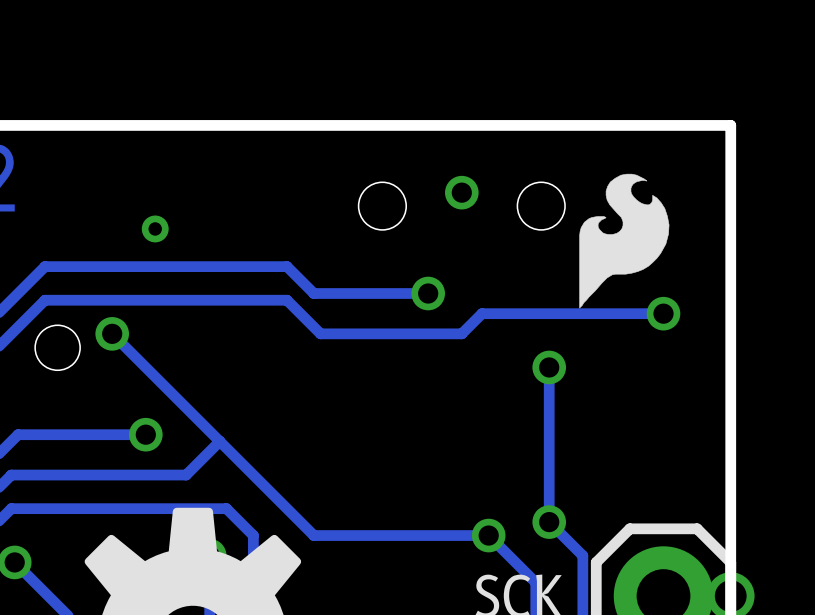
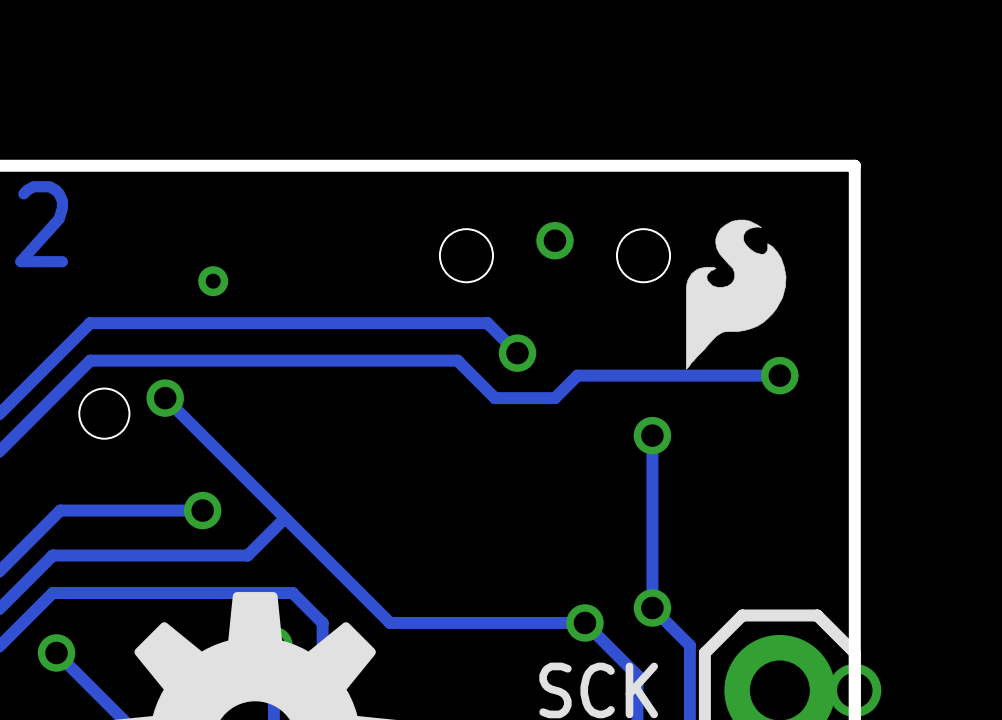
track: (287, 266) (313, 293) (428, 293) -> (360, 323) (487, 323) (517, 353)
track: (287, 300) (320, 333) (408, 333) -> (360, 360) (457, 360) (495, 398)

